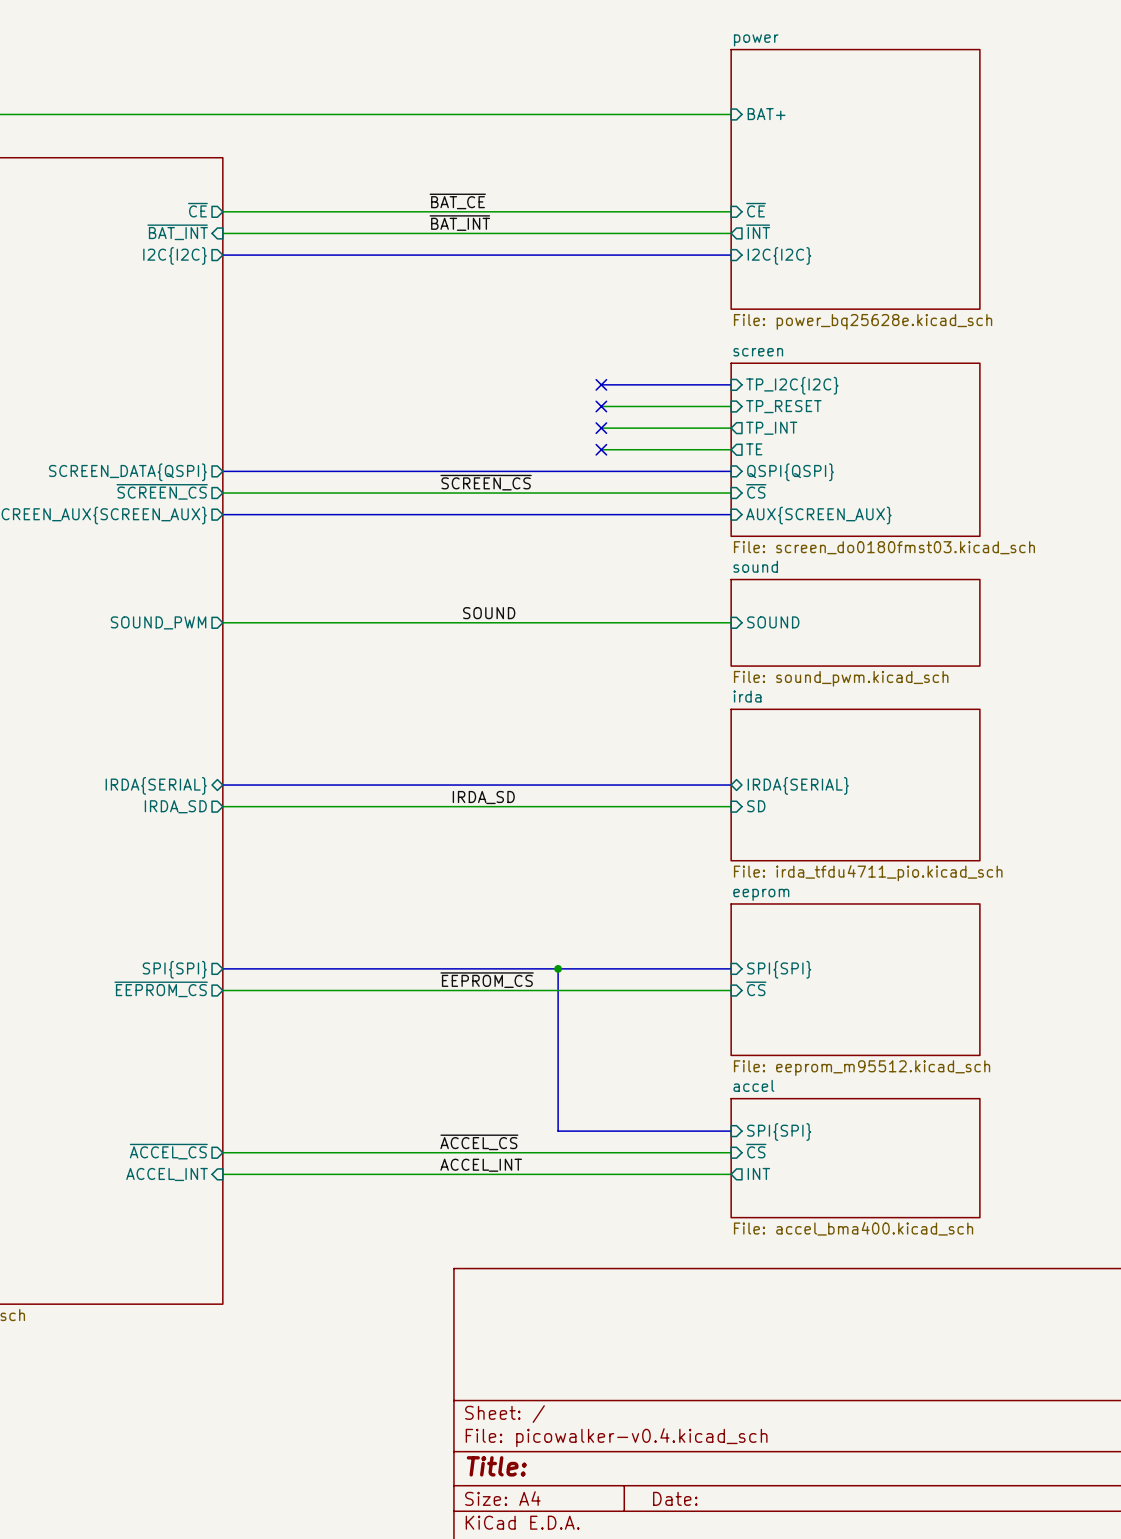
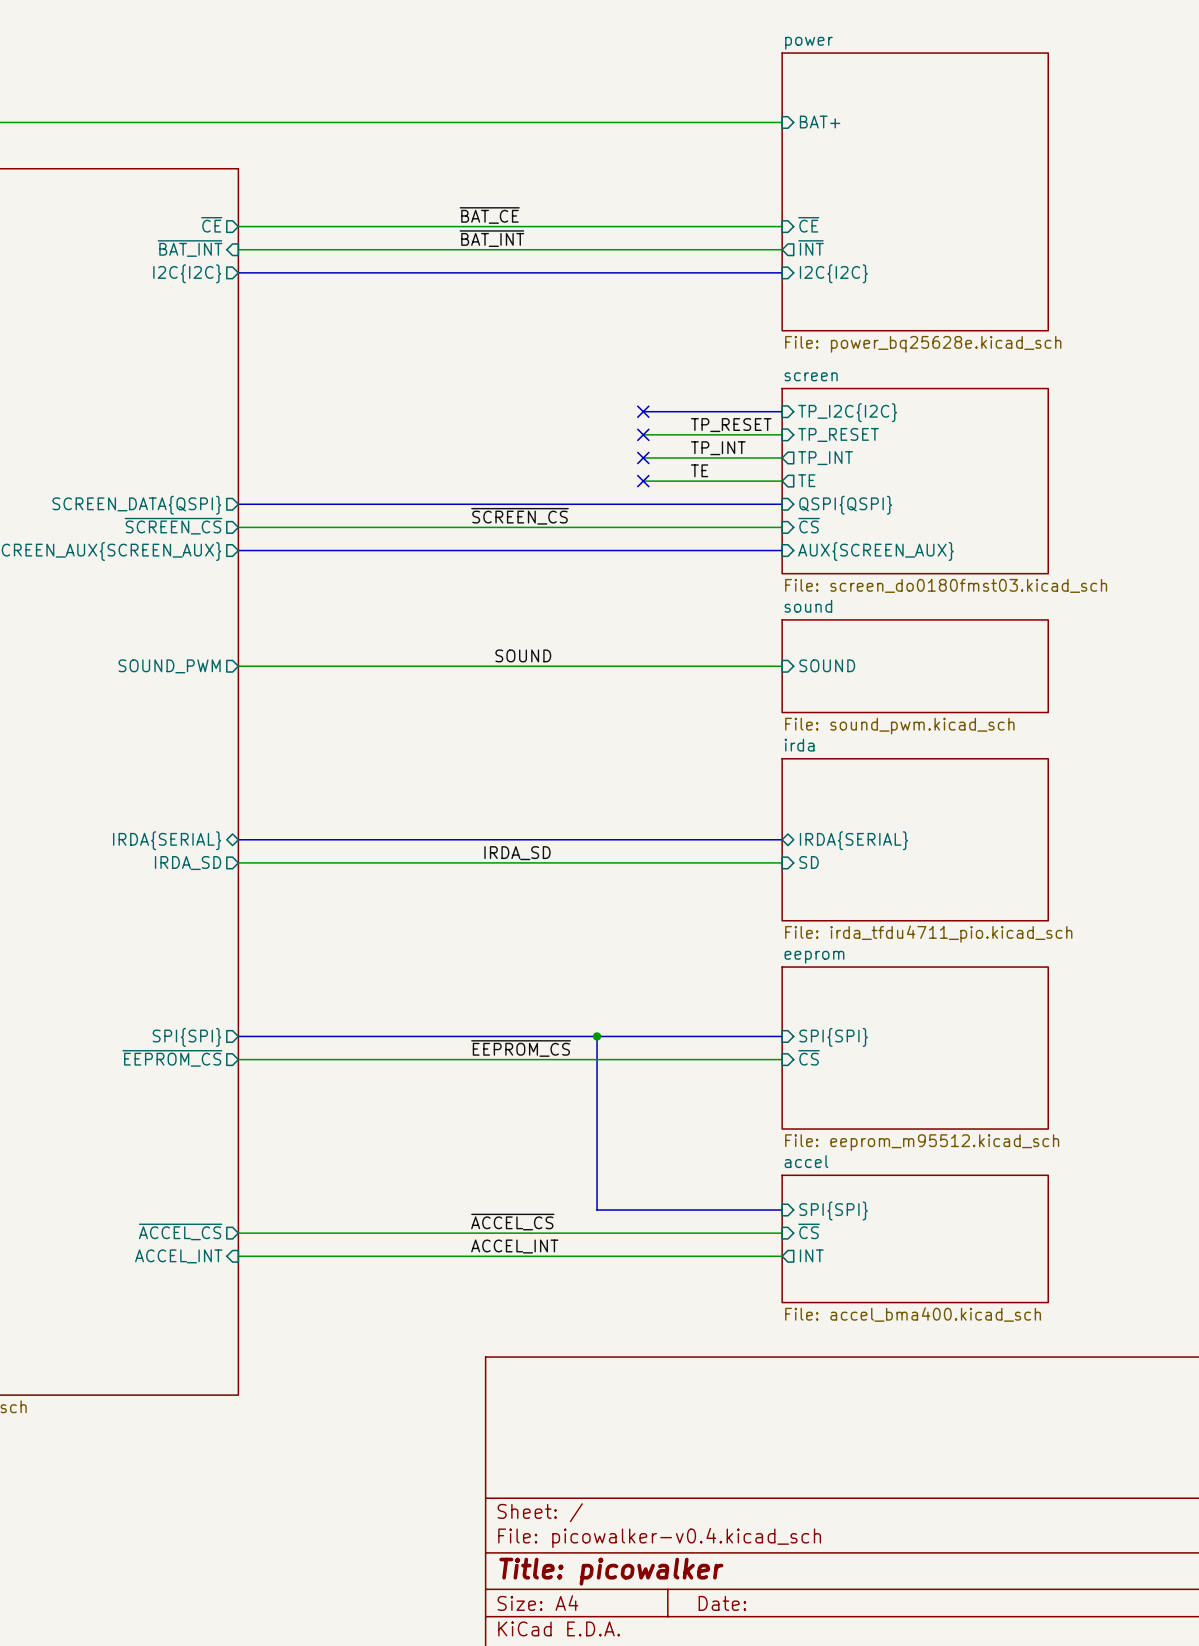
label: none -> TP_RESET (731, 425)
label: none -> TP_INT (718, 448)
label: none -> TE (699, 470)
title block: Title: (496, 1466) -> Title: picowalker (611, 1571)

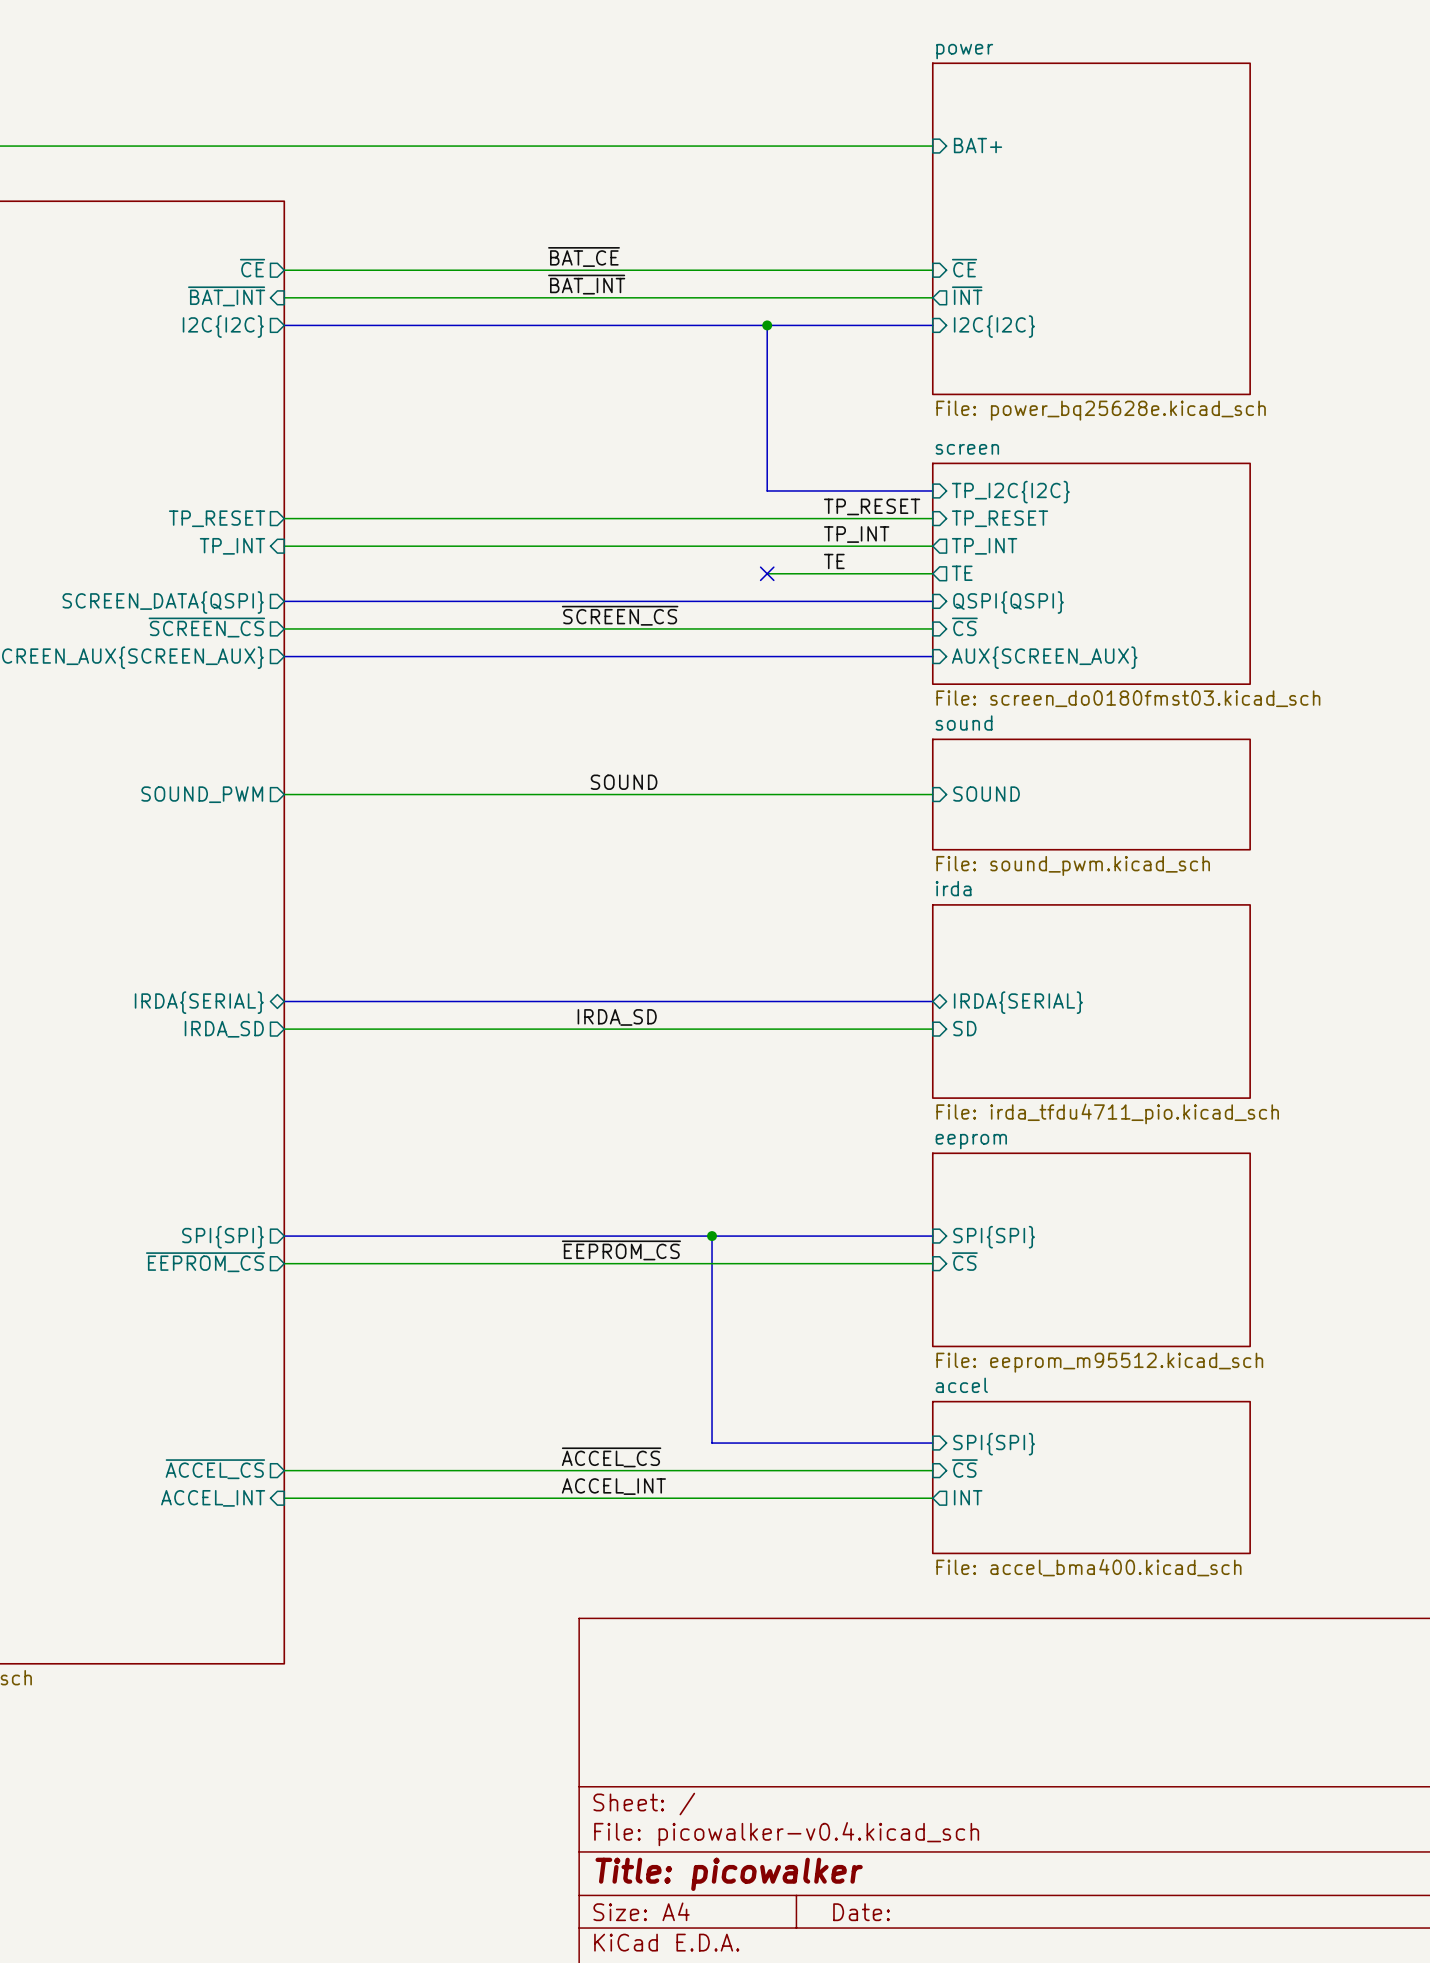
bus: none -> (767, 325) (767, 490)
junction: none -> (767, 325)
no-connect mark: (643, 411) -> none
sheet pin: none -> TP_RESET (217, 518)
wire: none -> (284, 518) (767, 518)
no-connect mark: (643, 434) -> none
wire: none -> (284, 546) (767, 546)
no-connect mark: (643, 457) -> none
sheet pin: none -> TP_INT (232, 546)

